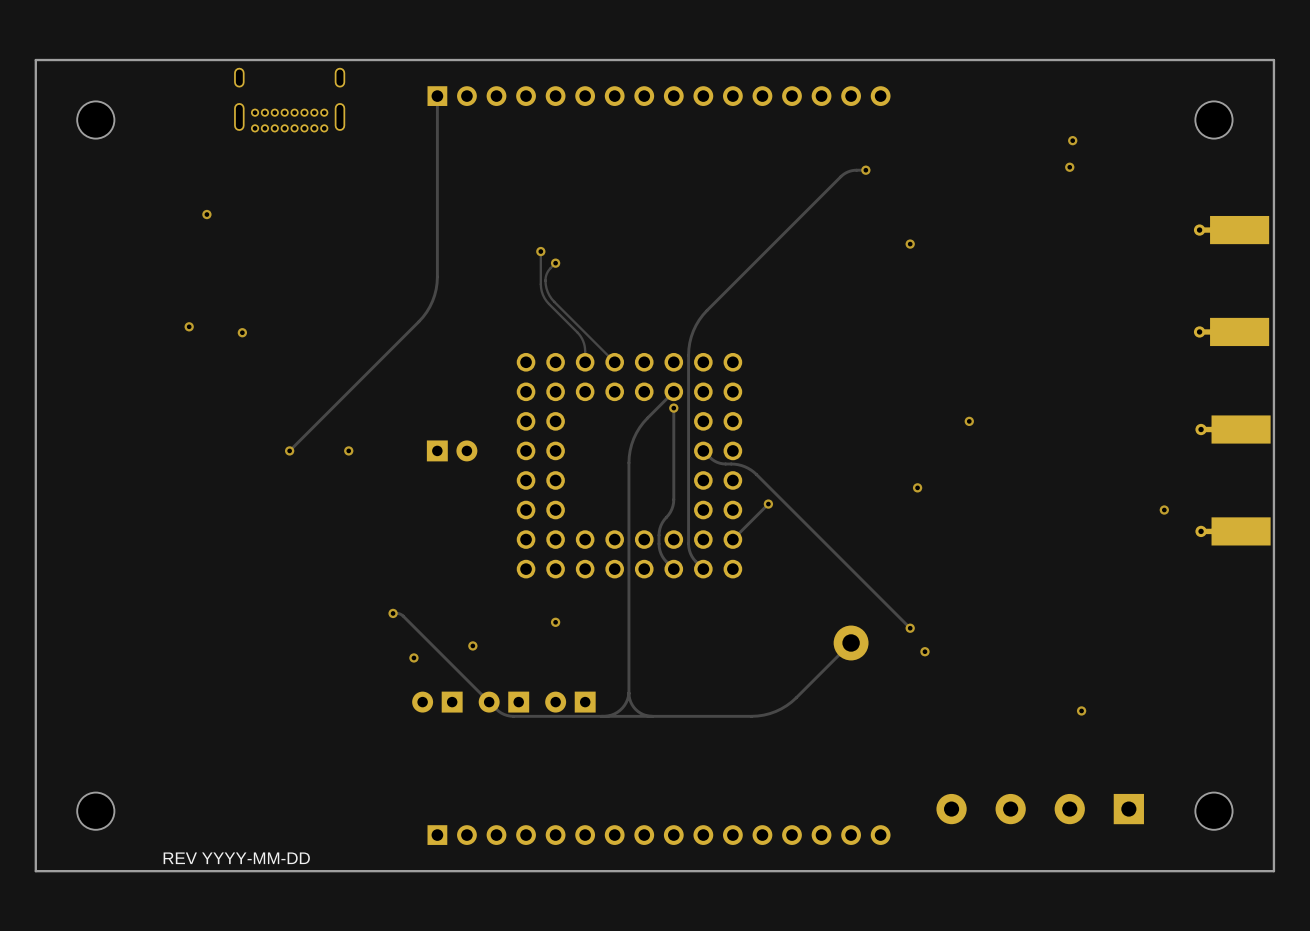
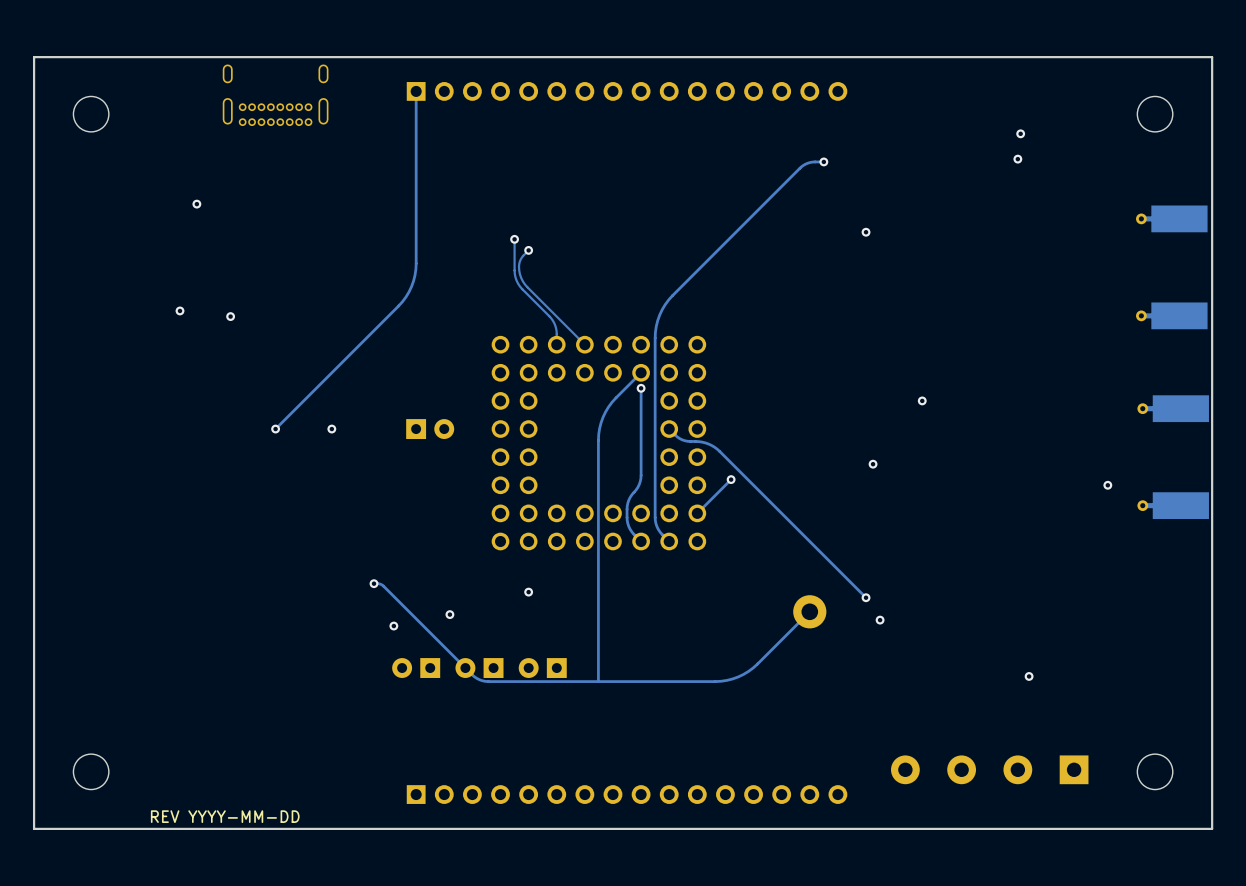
track: none -> (598, 659) (598, 681)
track: (652, 716) (643, 714) (635, 709) (630, 701) (628, 693) (626, 702) (620, 710) (611, 715) (601, 716) -> none

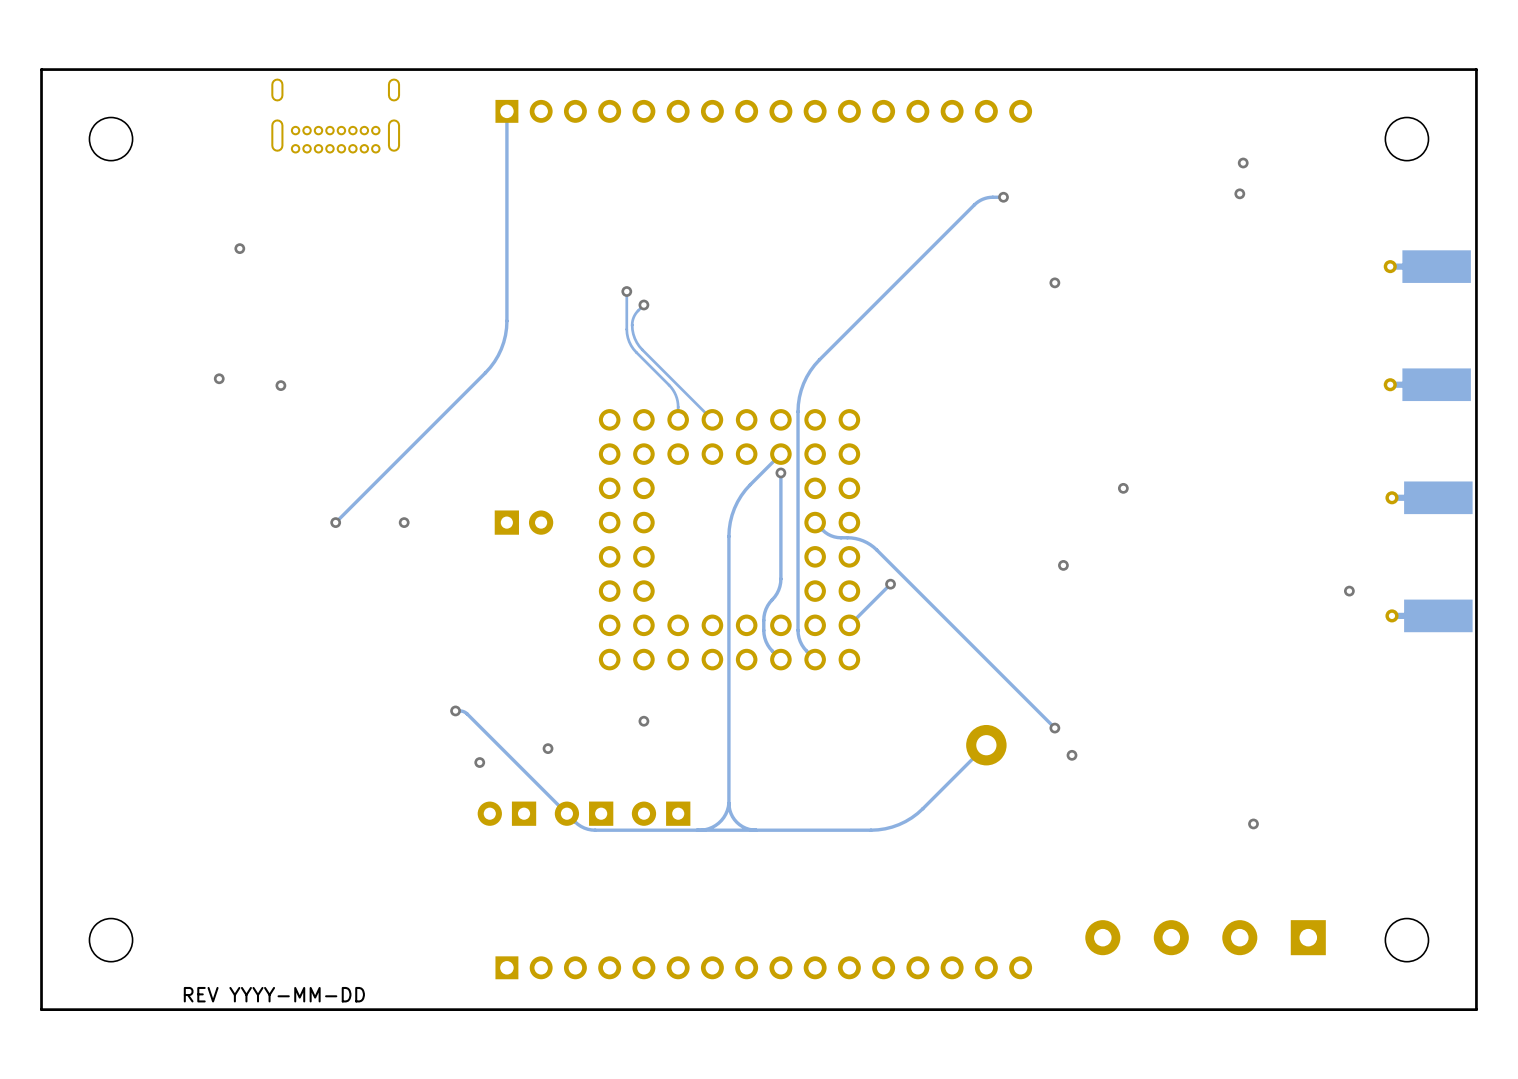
track: (598, 659) (598, 681) -> none
track: none -> (755, 830) (745, 828) (736, 822) (730, 813) (728, 803) (725, 814) (718, 823) (708, 828) (697, 830)

